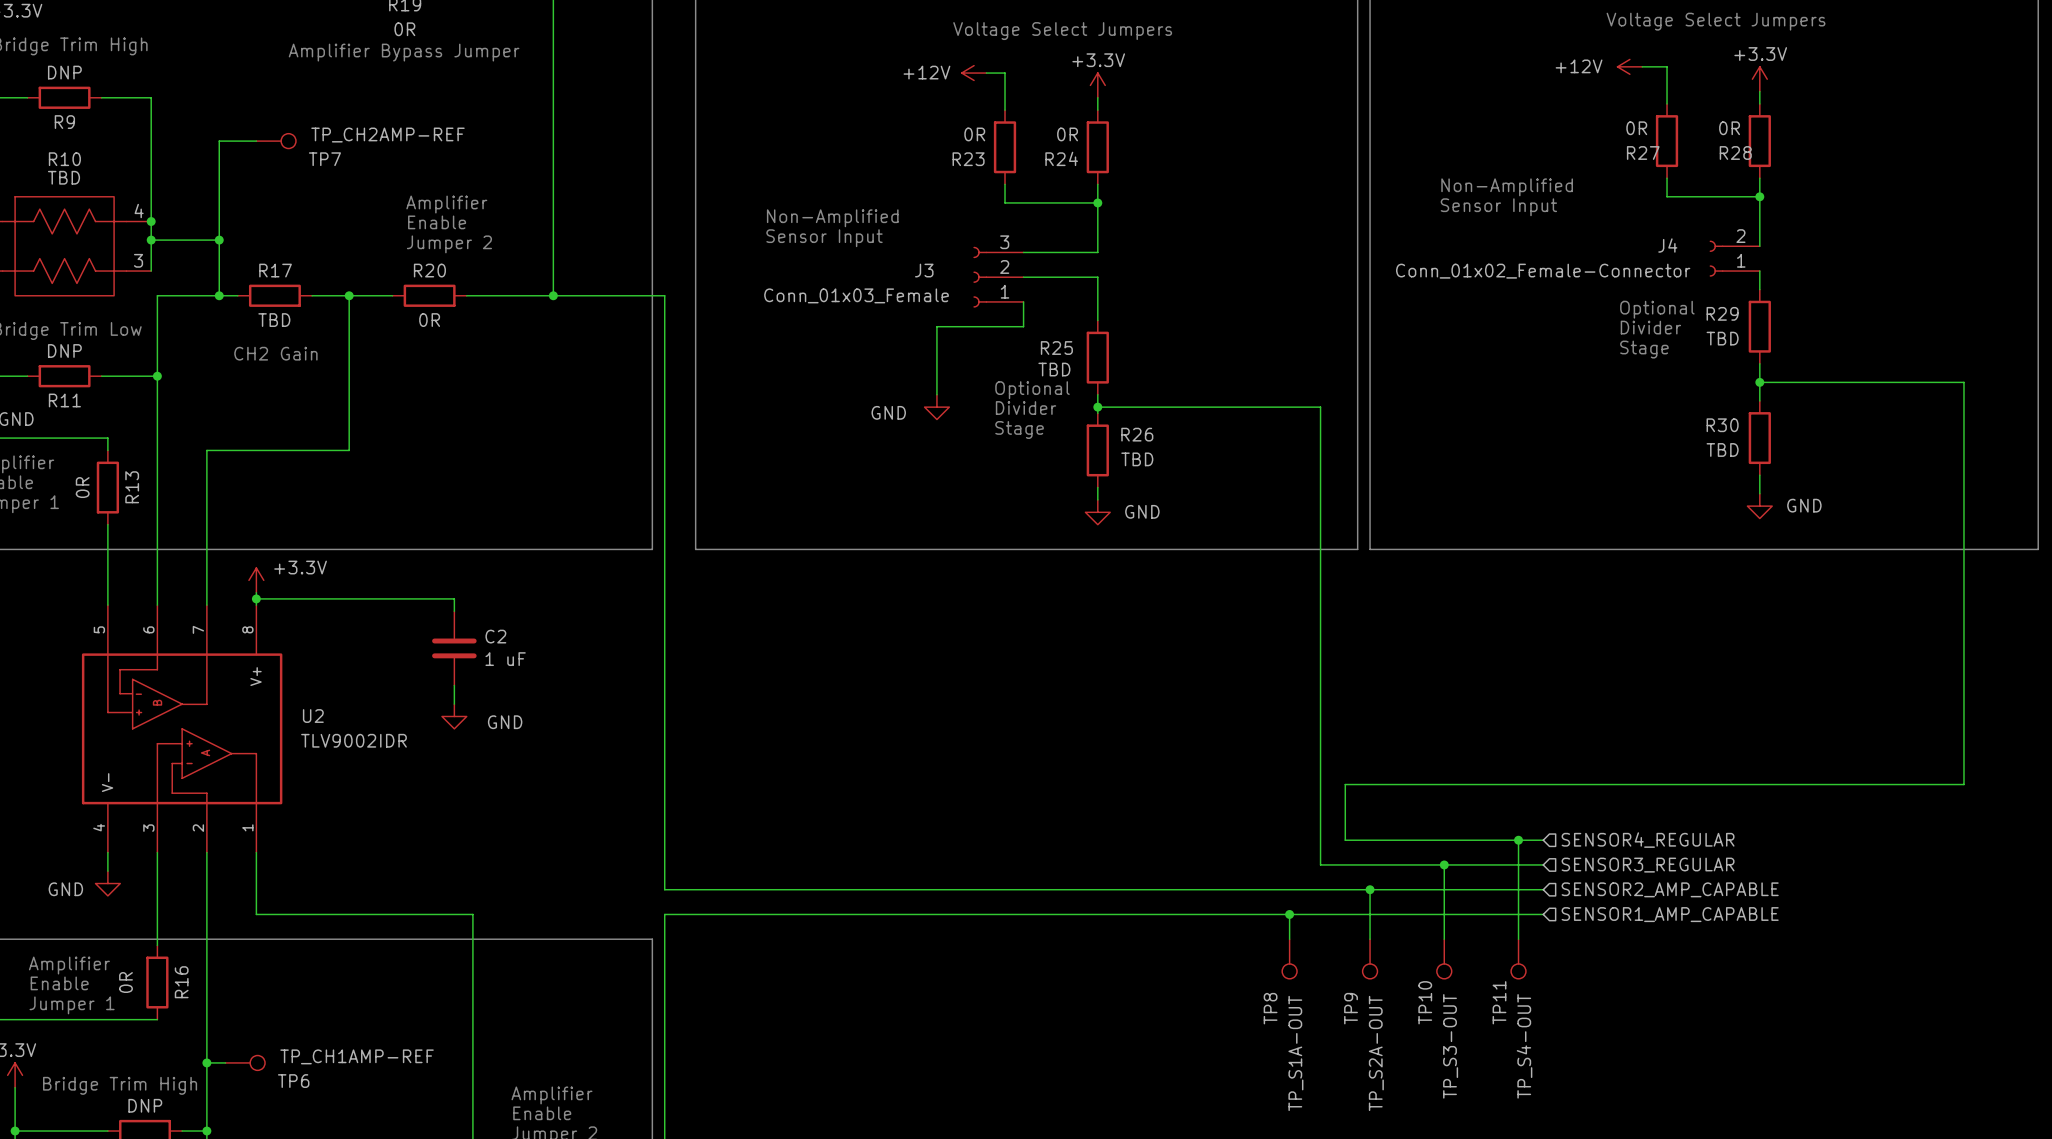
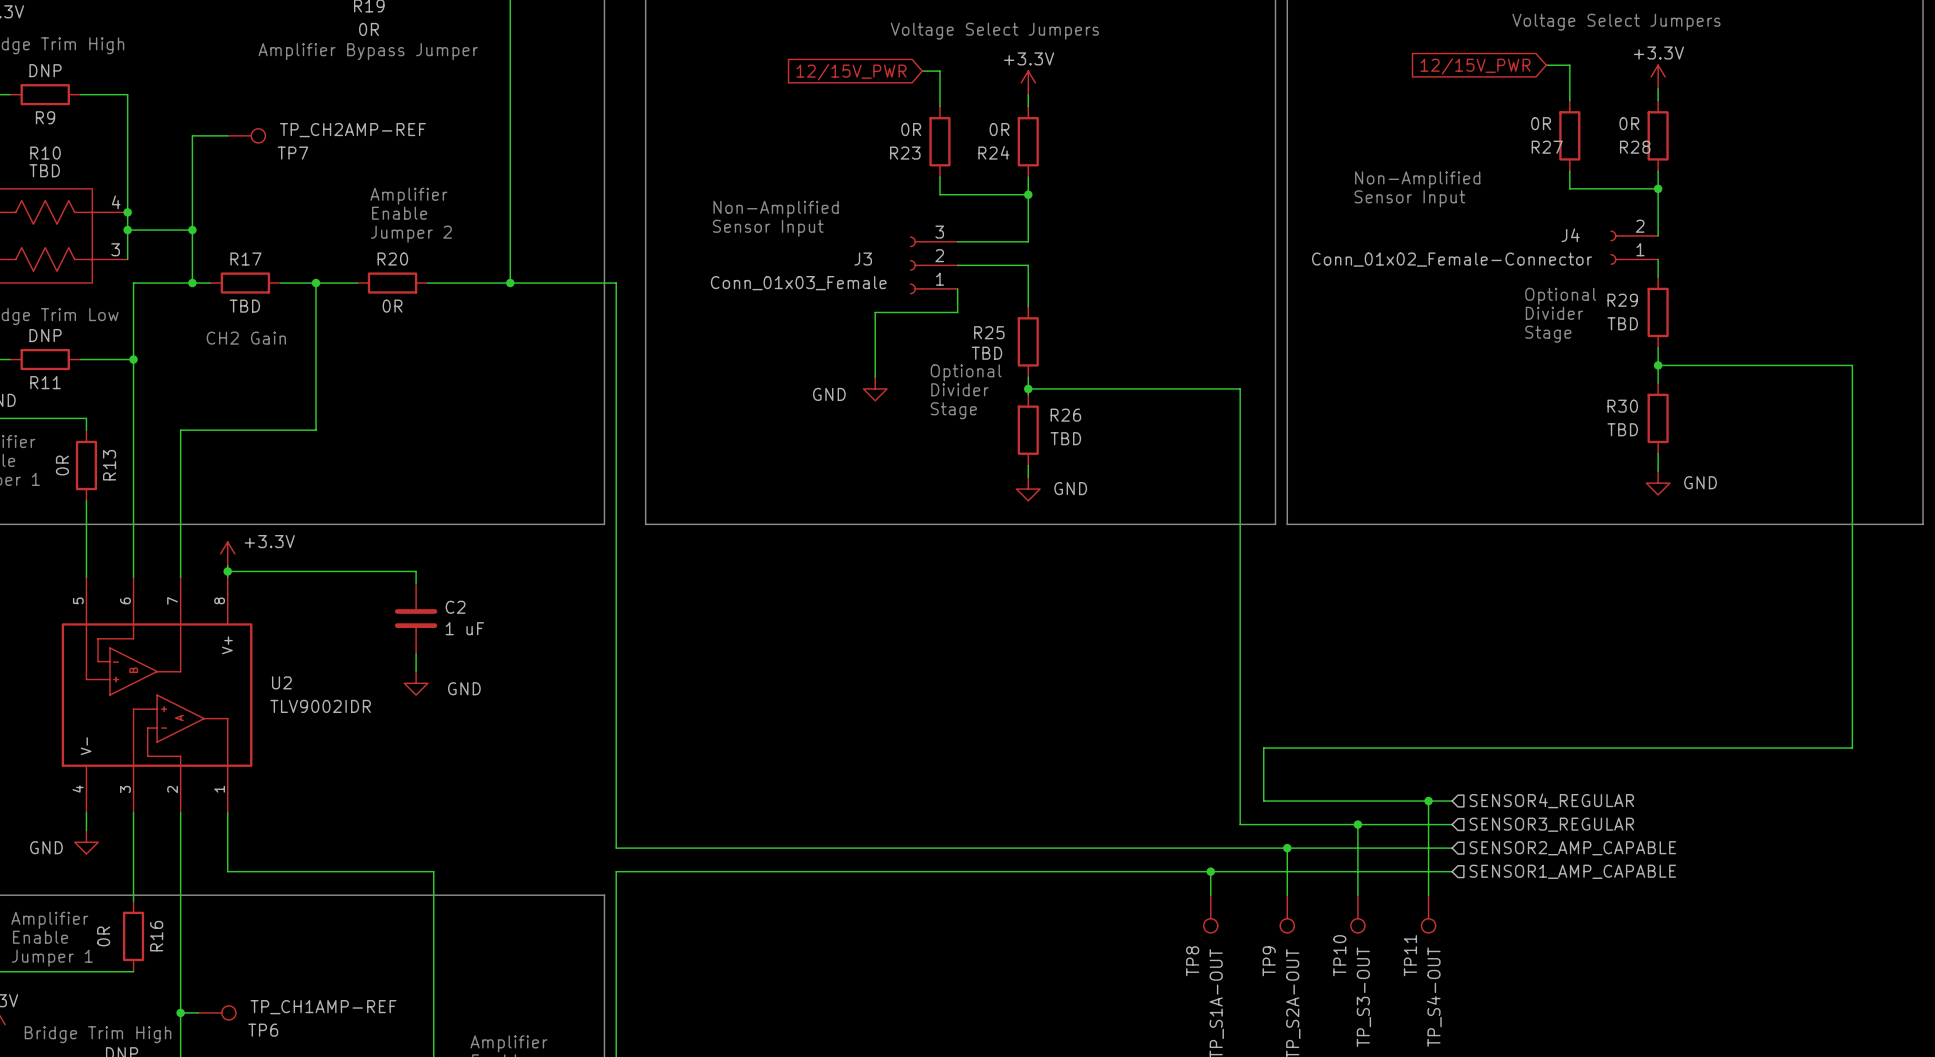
power symbol: +12V (1629, 66) -> none
global label: none -> 12/15V_PWR (1475, 66)
power symbol: +12V (974, 73) -> none
global label: none -> 12/15V_PWR (851, 72)

